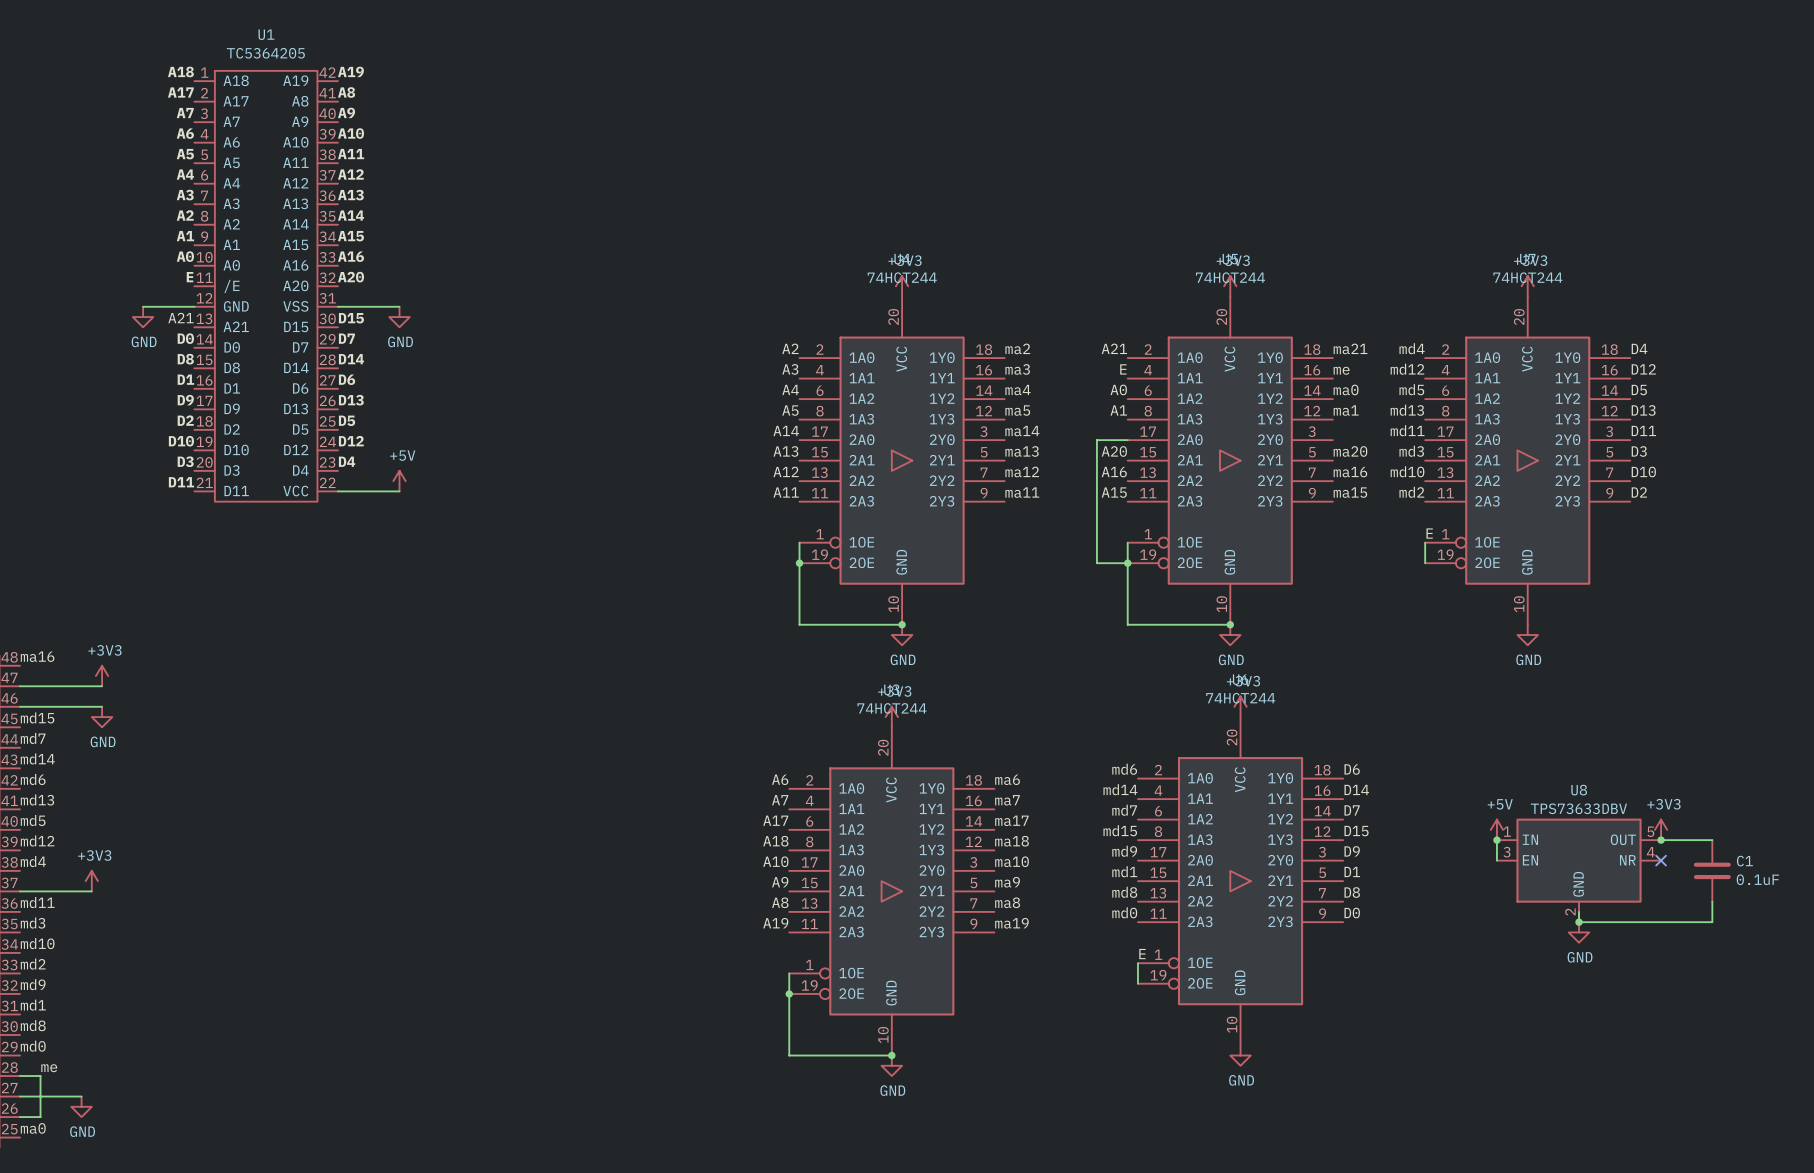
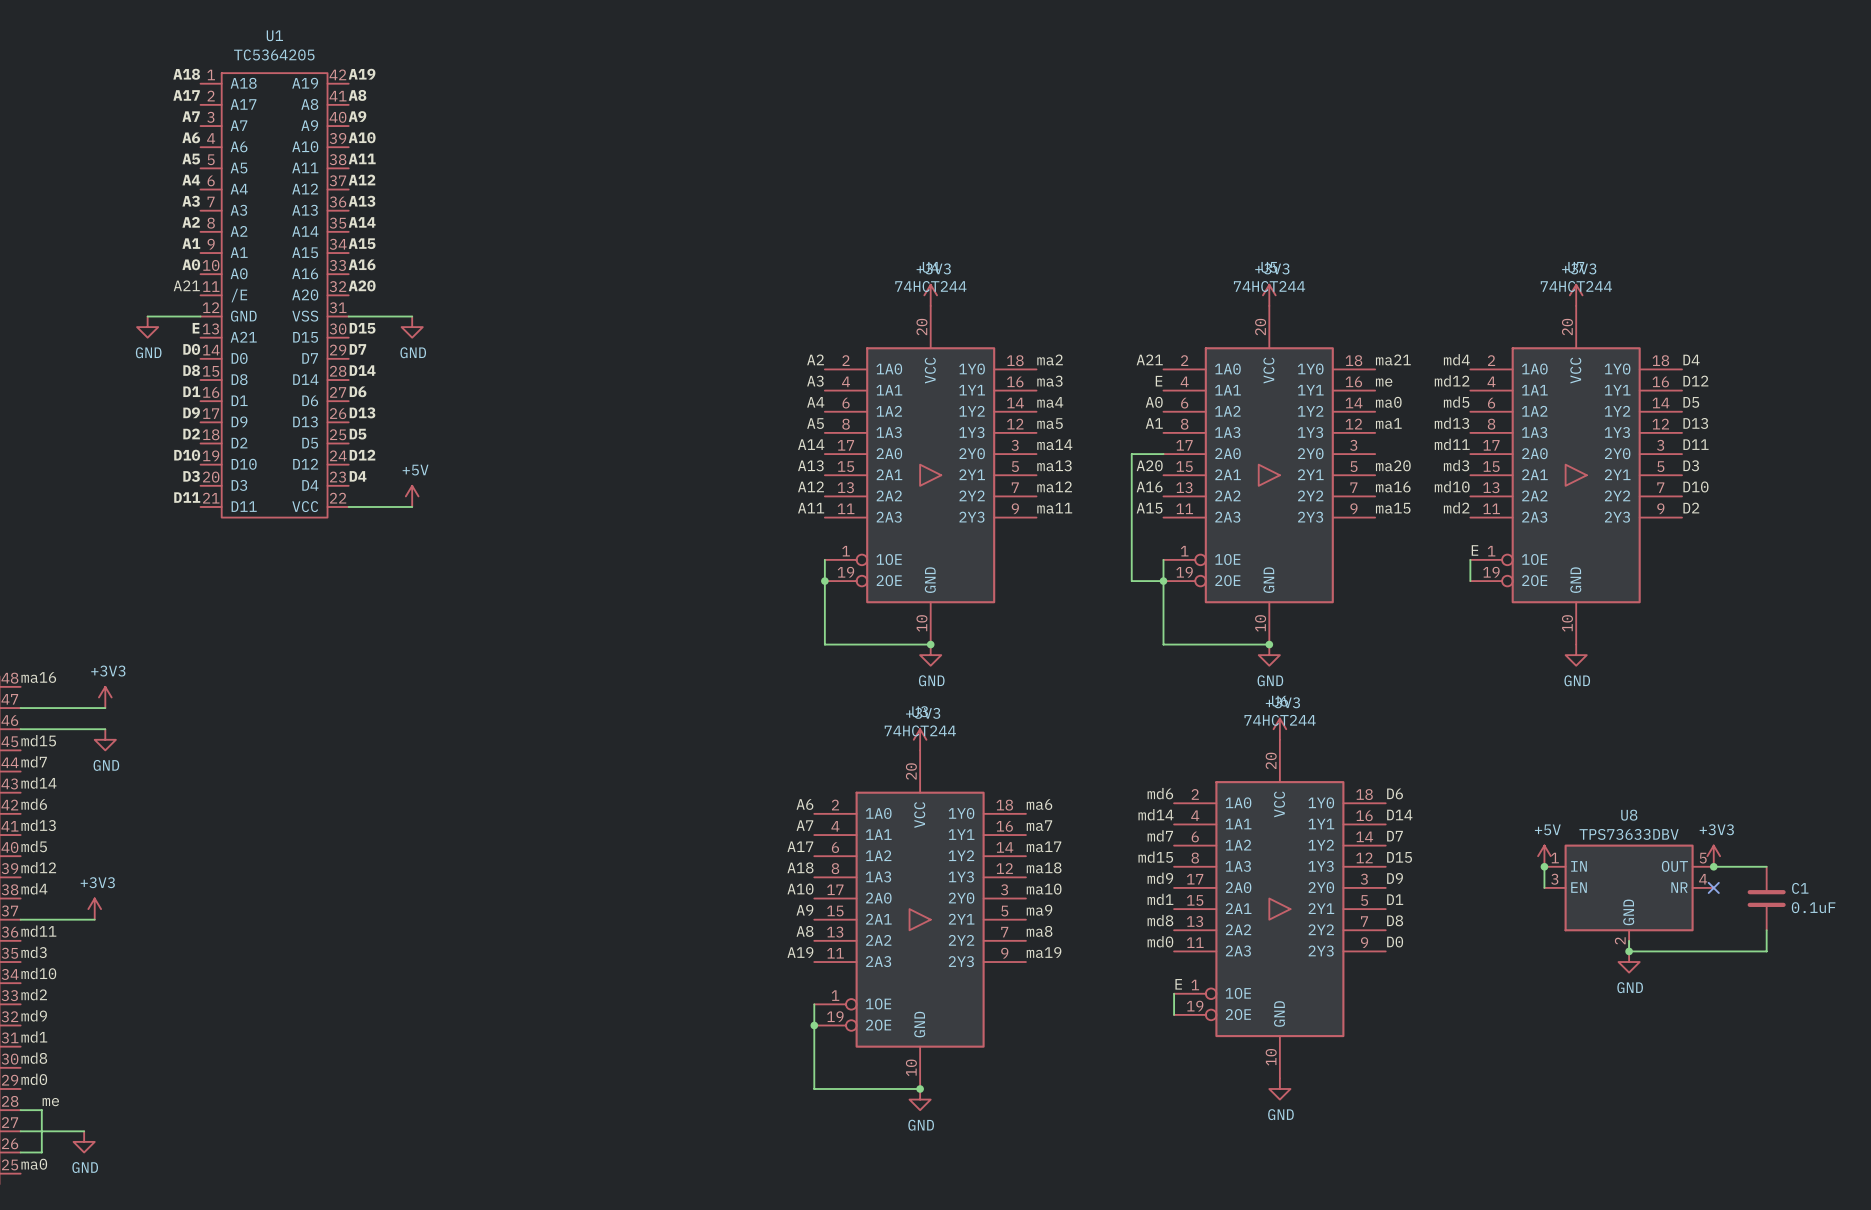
label: E (190, 277) -> A21 (186, 285)
label: A21 (181, 318) -> E (196, 328)

